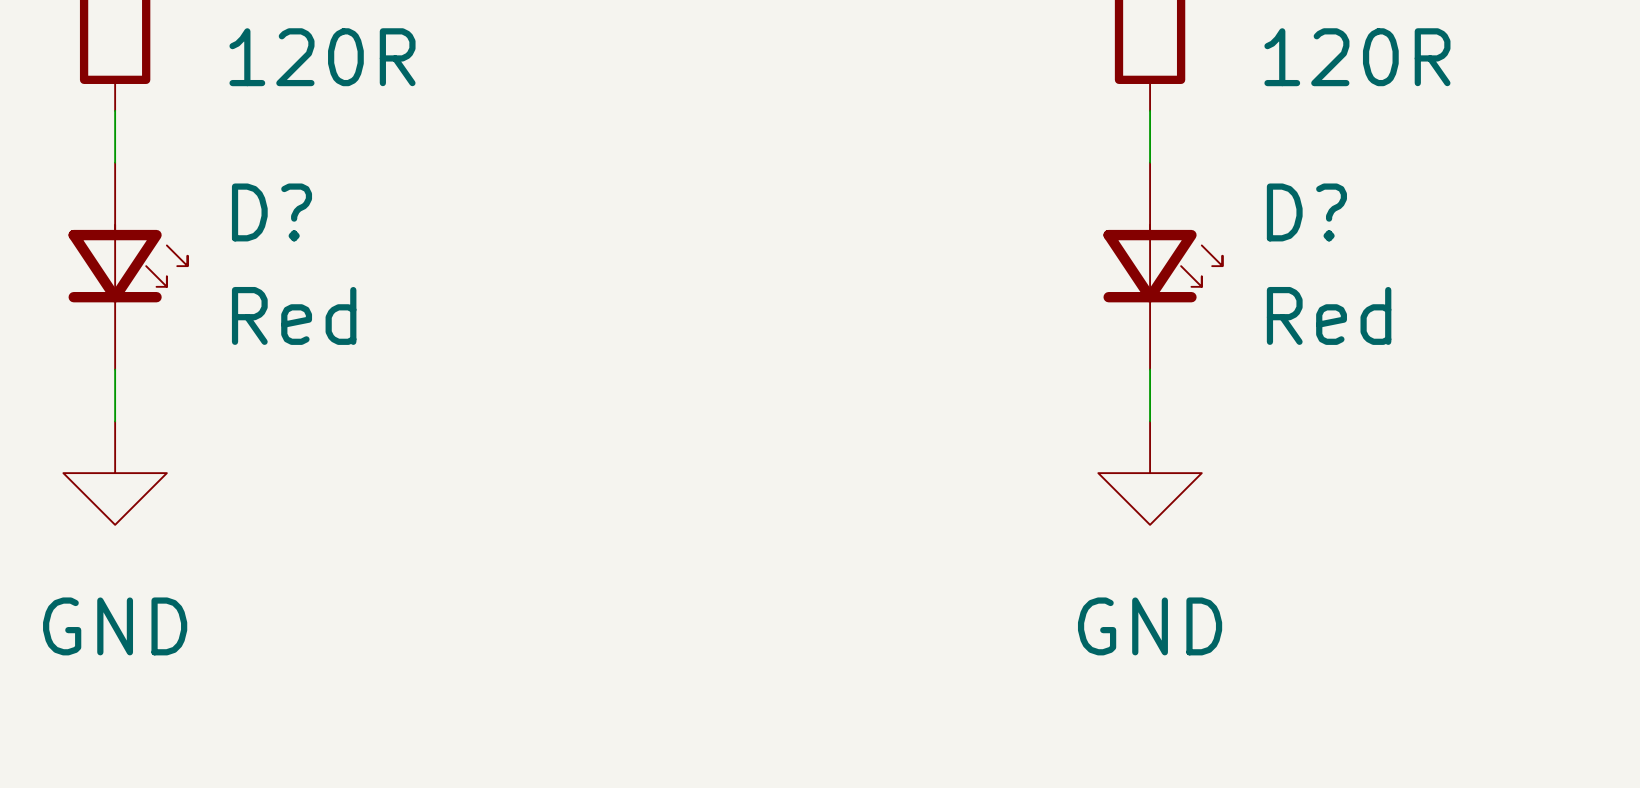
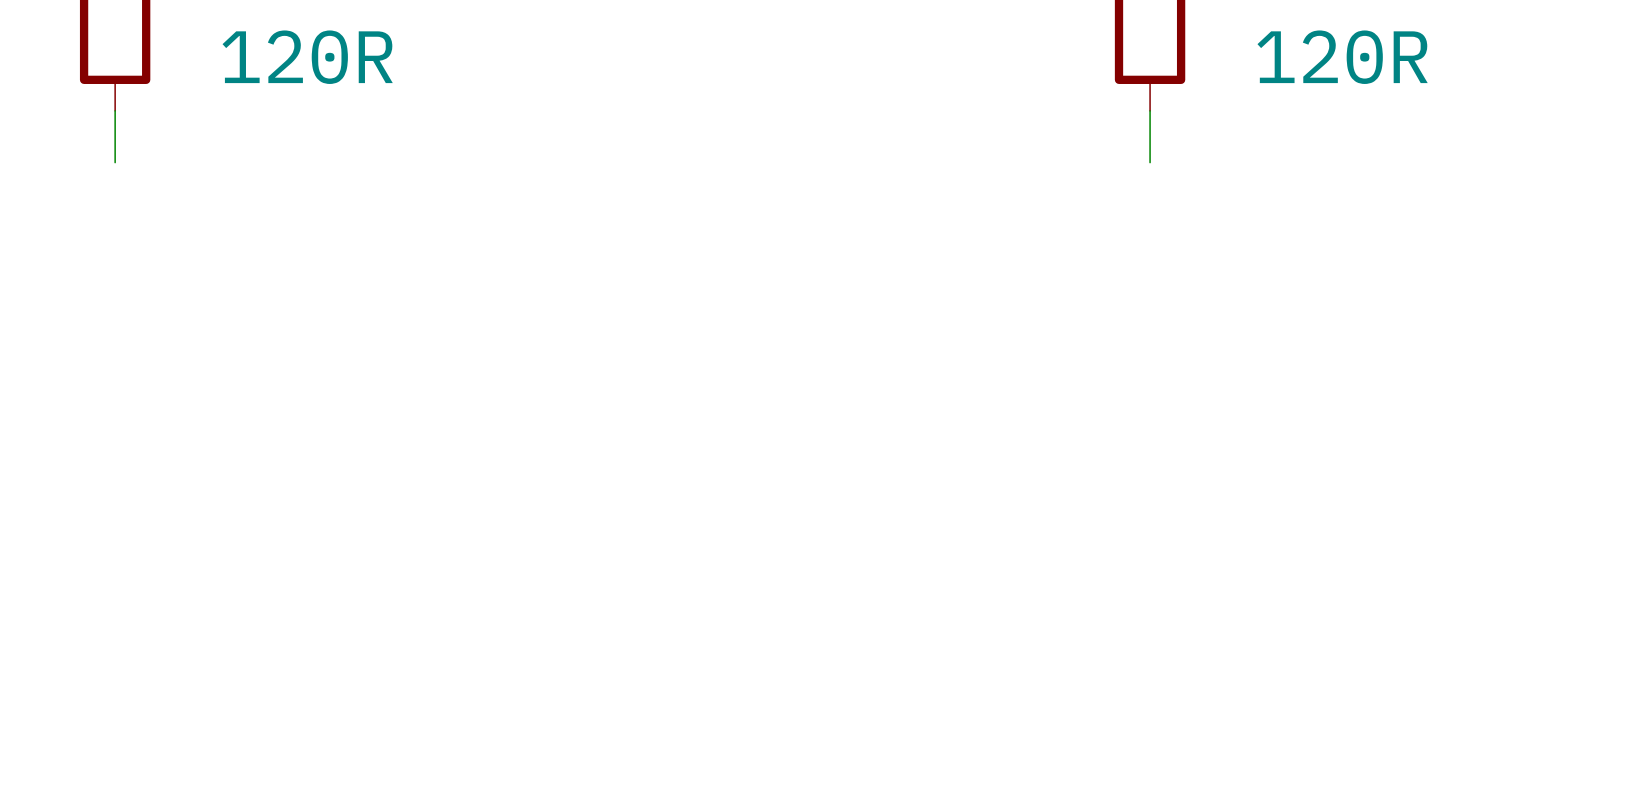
D?: Red (128, 266) -> none
D?: Red (1162, 266) -> none
wire: (115, 369) (115, 421) -> none
wire: (1150, 369) (1150, 421) -> none
power symbol: GND (115, 473) -> none
power symbol: GND (1150, 473) -> none

